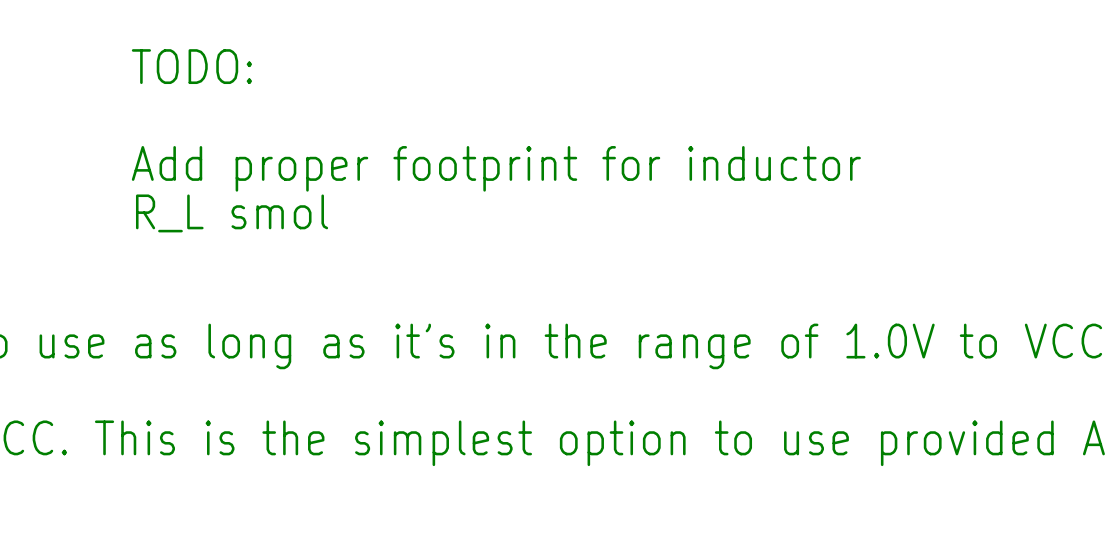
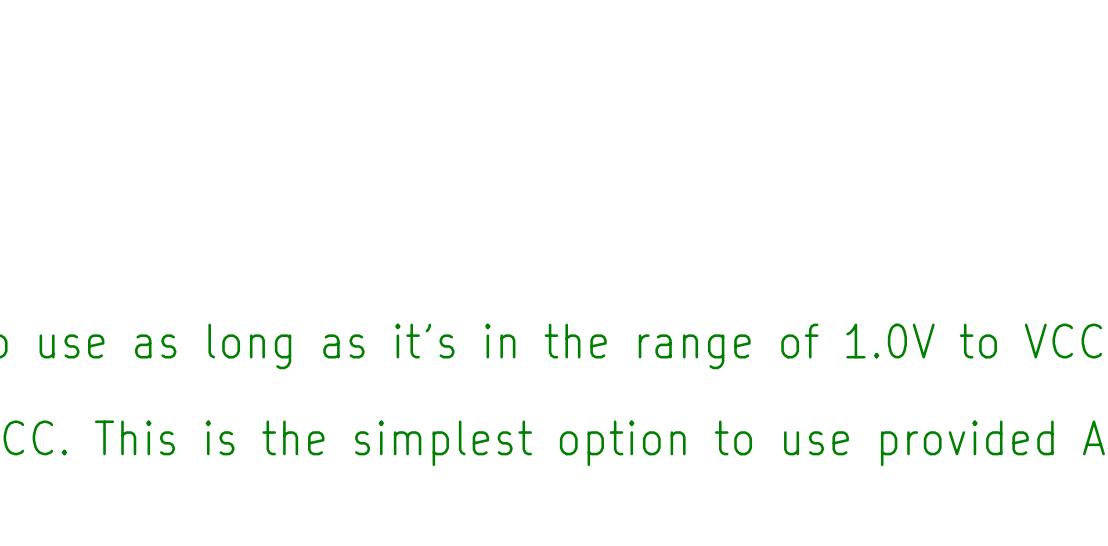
text: TODO: (191, 66) -> none
text: Add proper footprint for inductor (496, 168) -> none
text: R_L smol (232, 213) -> none

